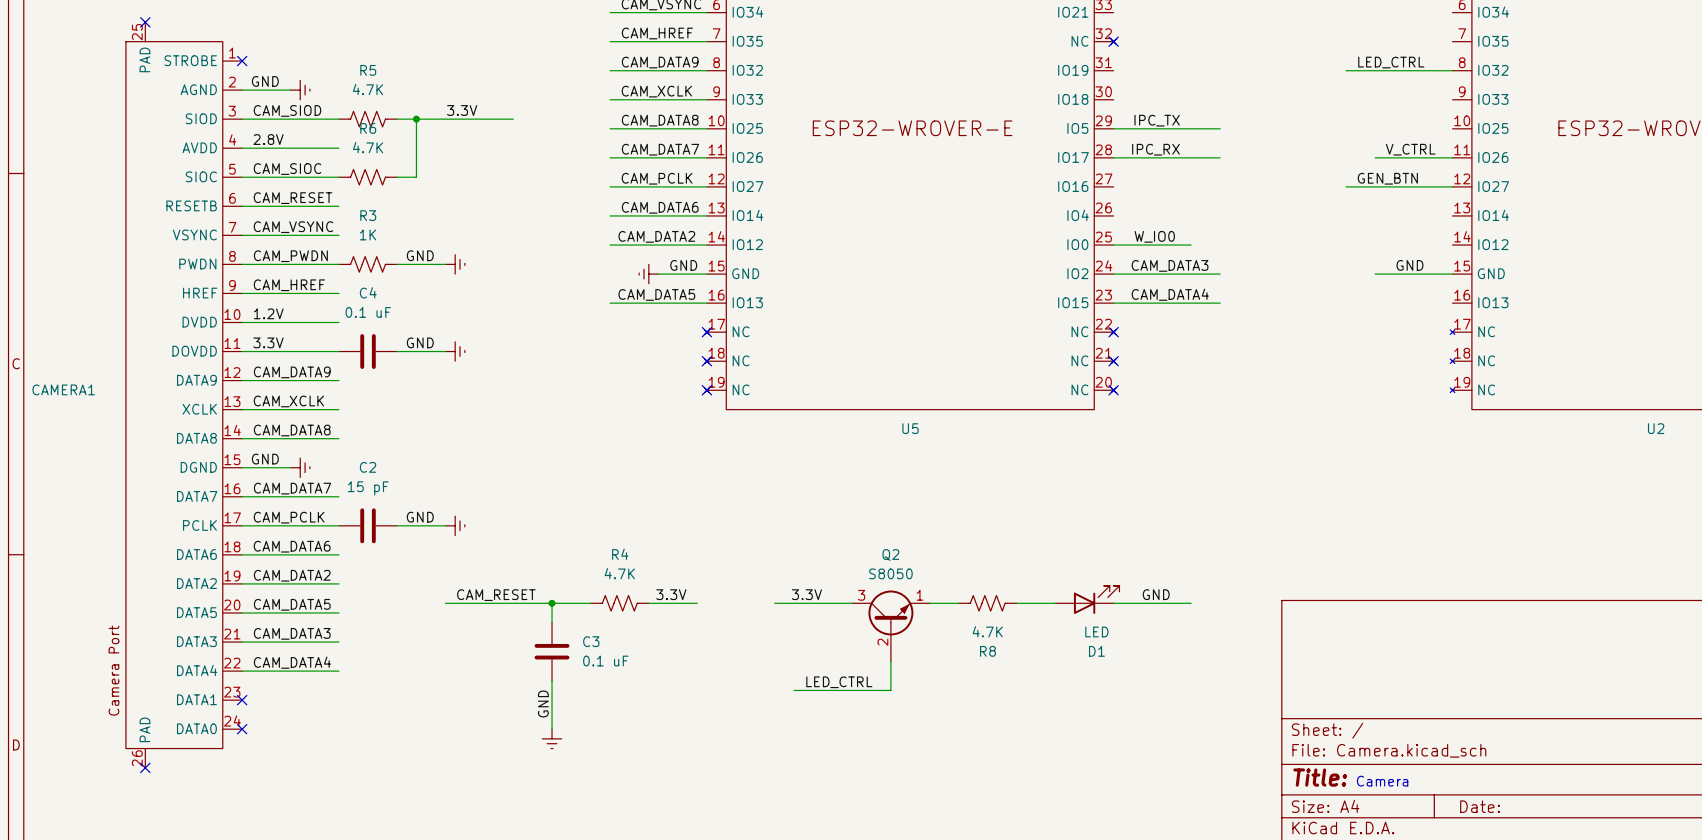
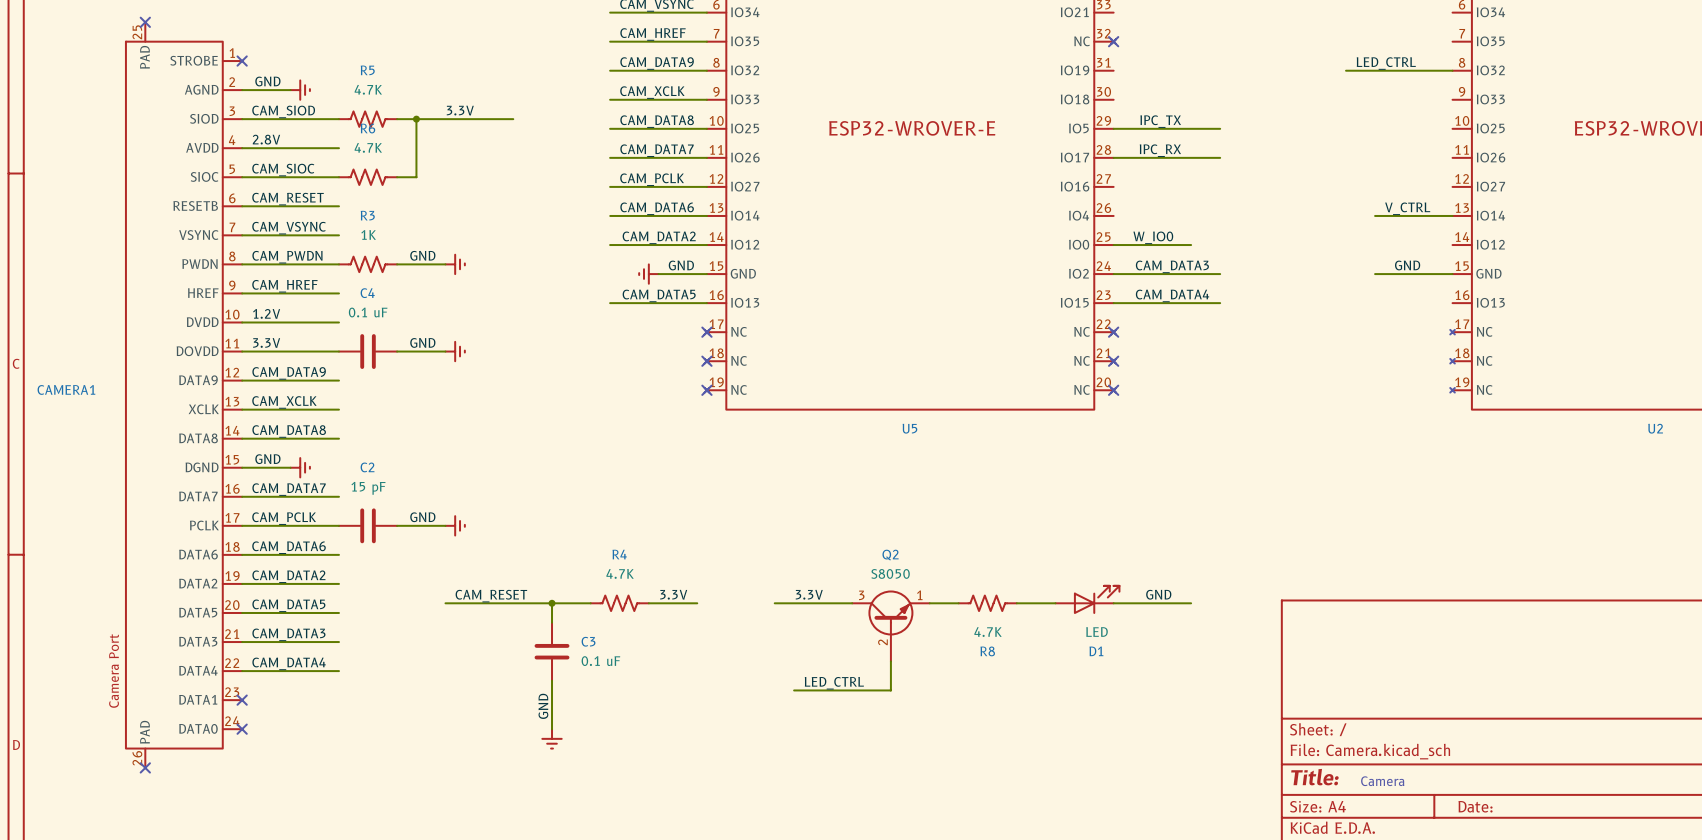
label position: V_CTRL (1410, 149) -> V_CTRL (1407, 208)
wire: (1375, 157) (1452, 157) -> (1375, 215) (1452, 215)
label: GEN_BTN (1387, 178) -> none
wire: (1346, 186) (1452, 186) -> none

